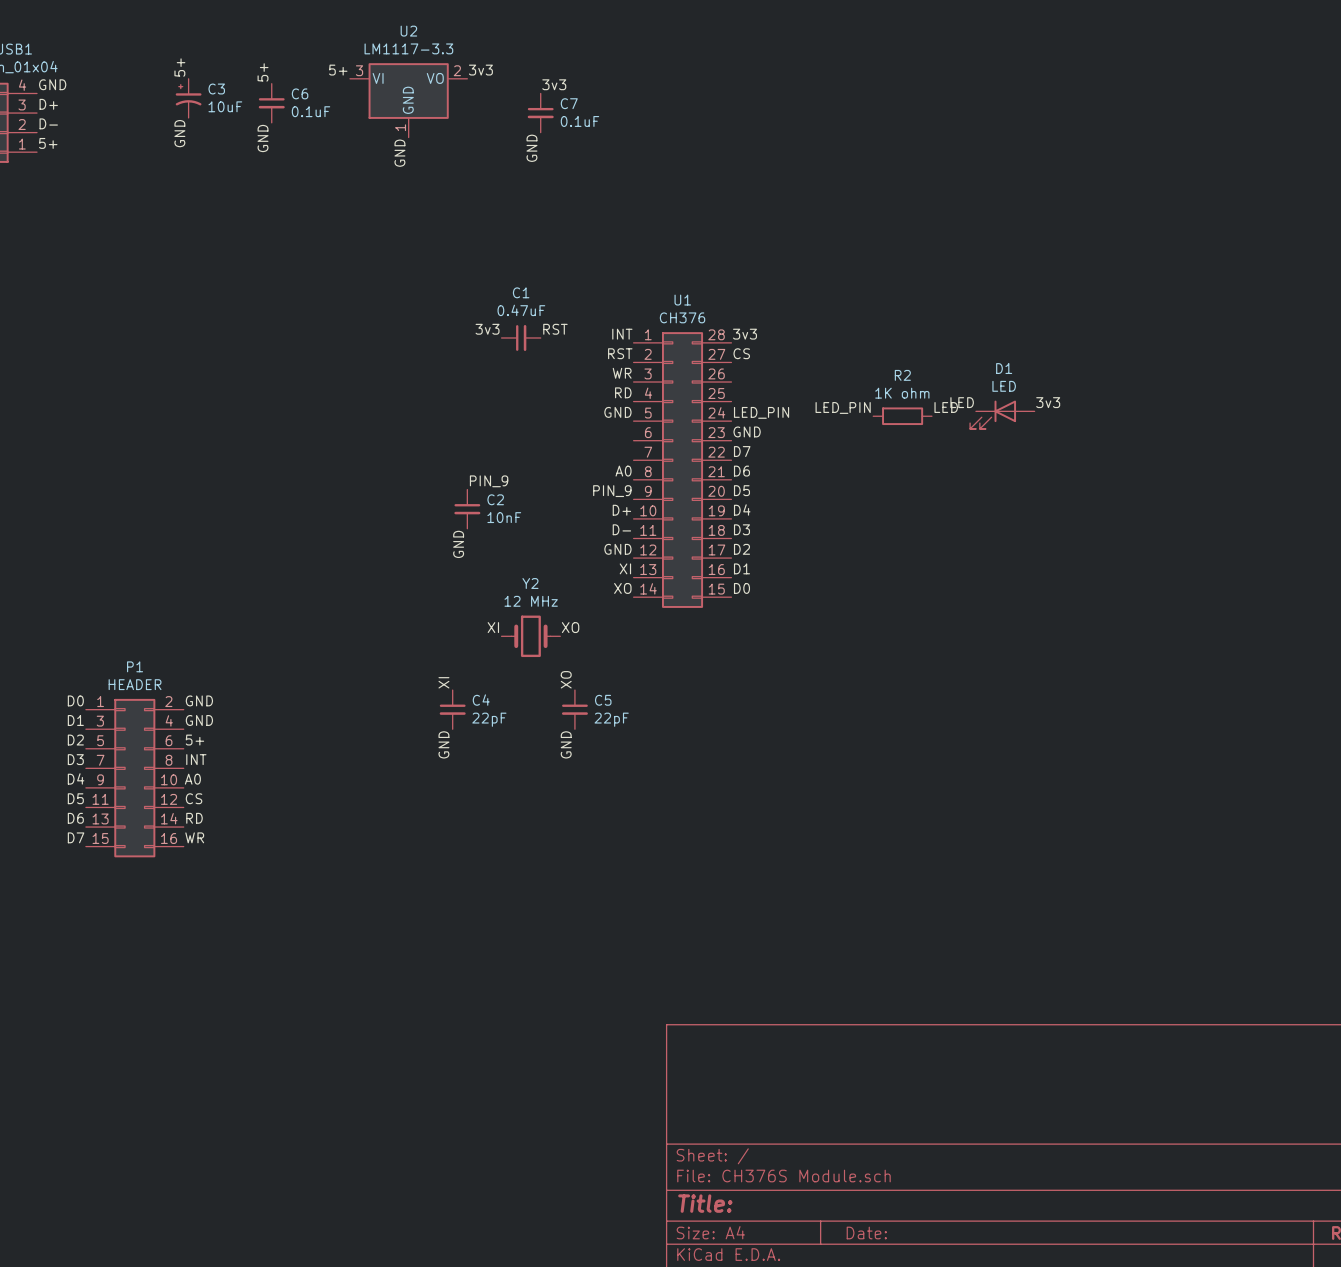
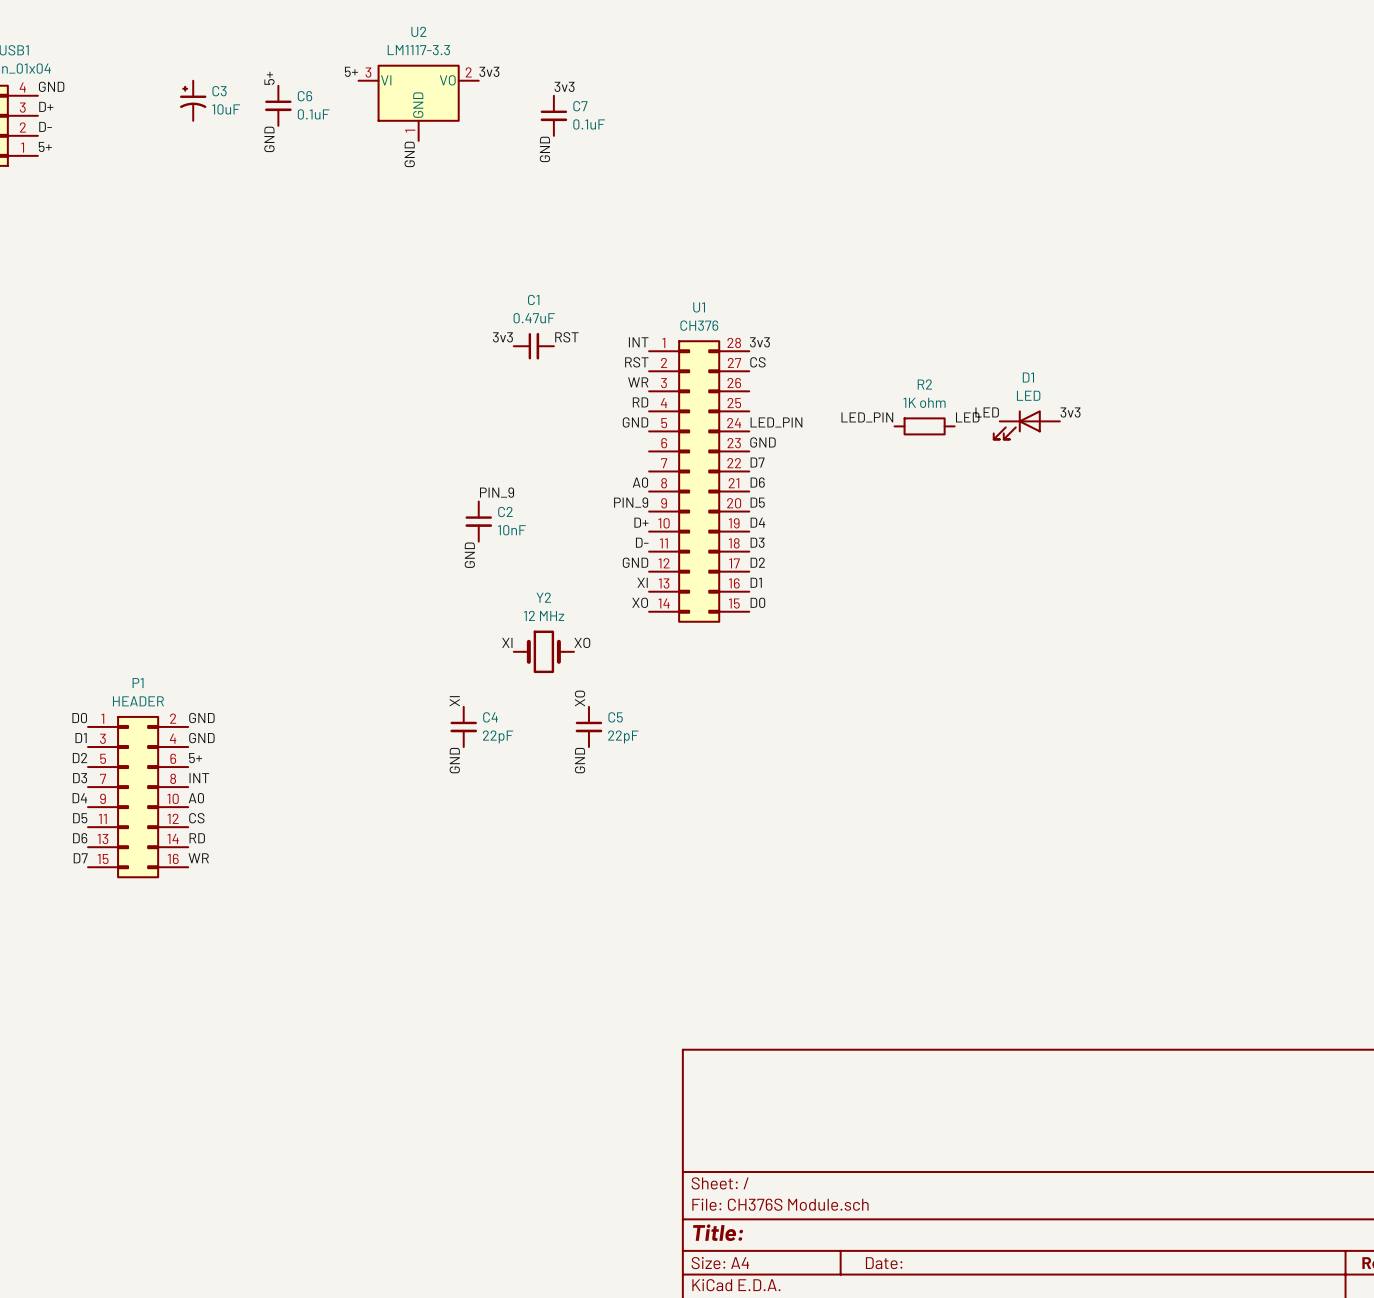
label: 5+ (179, 67) -> none
label: GND (179, 133) -> none

